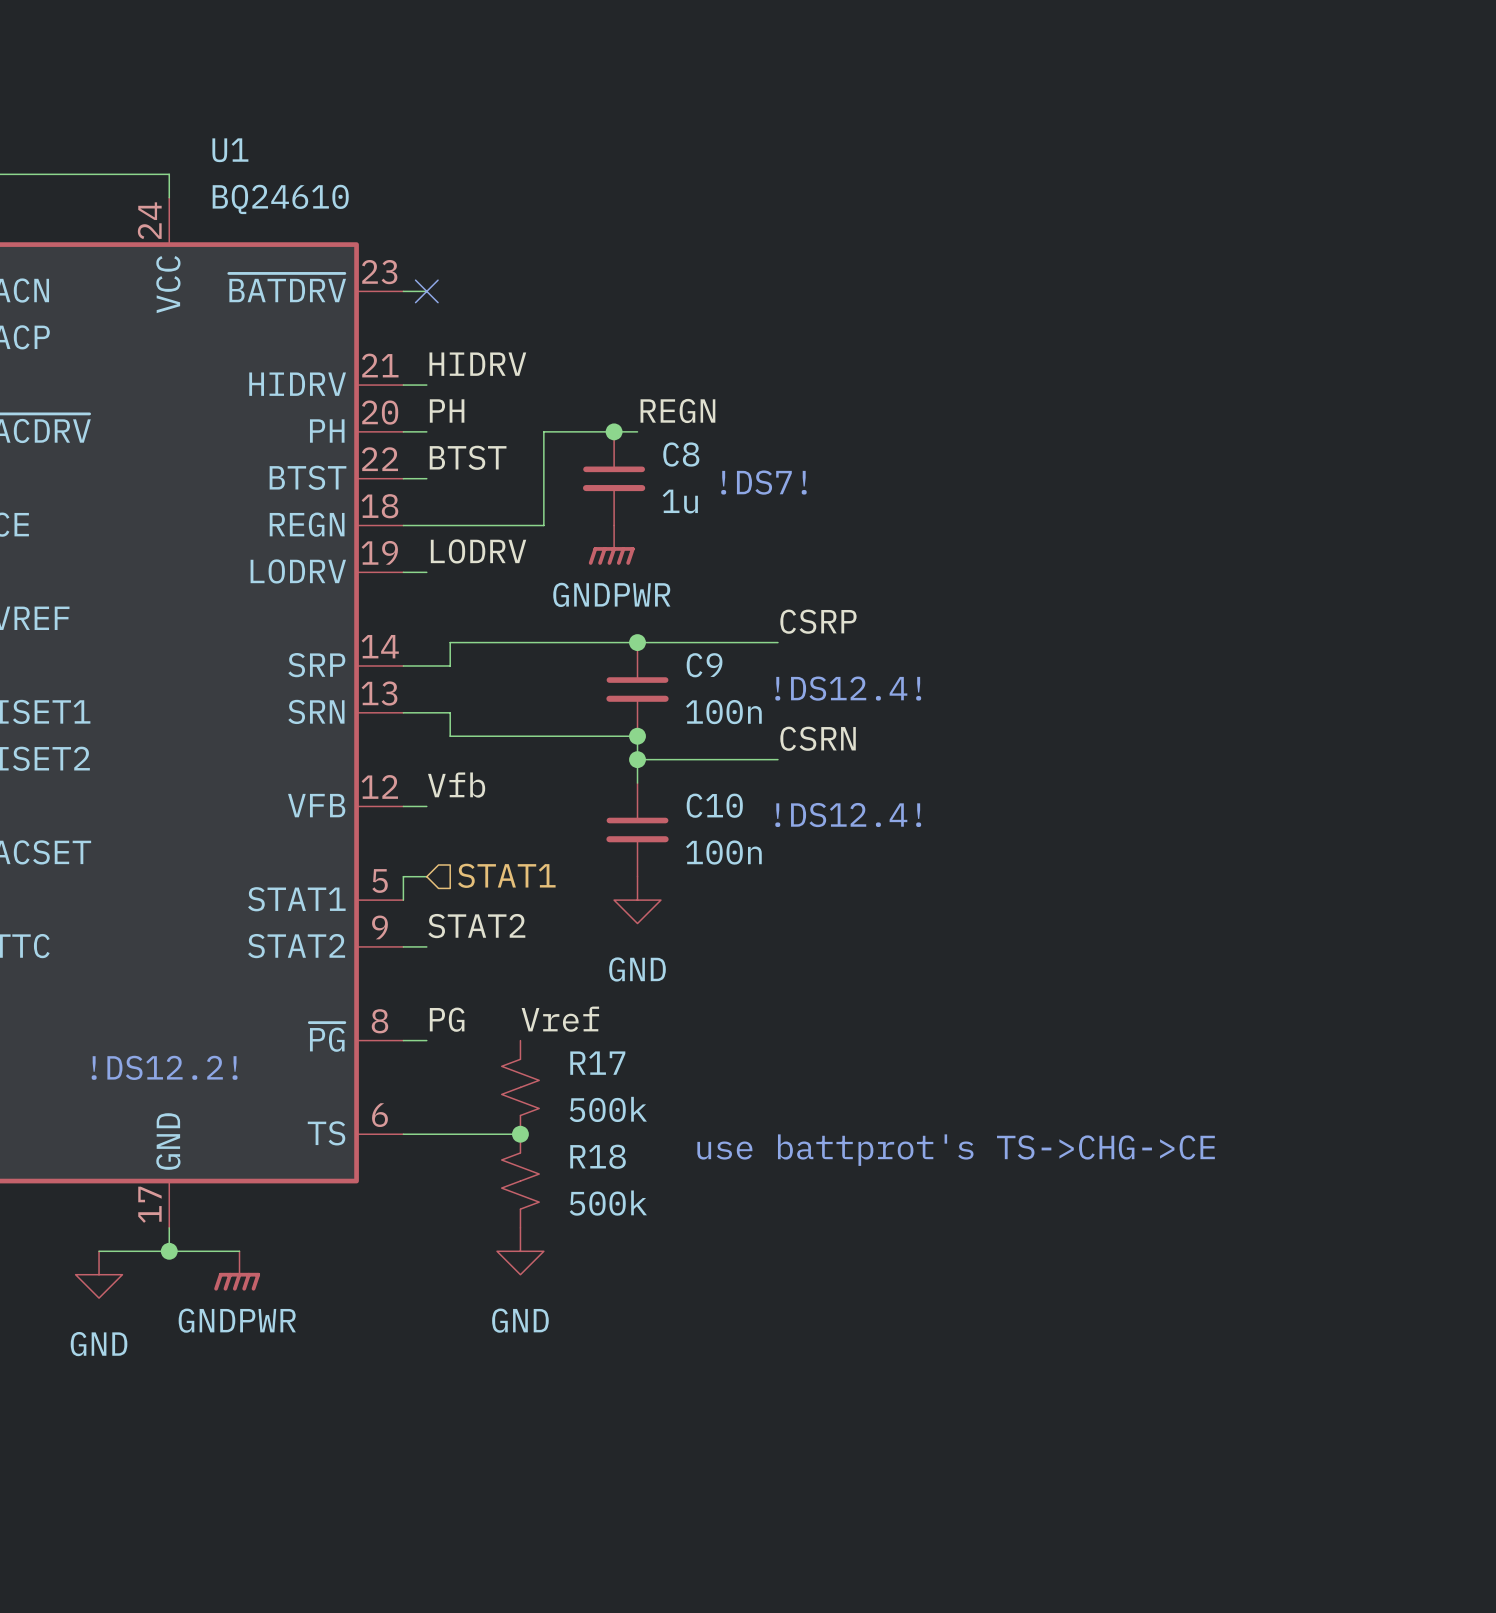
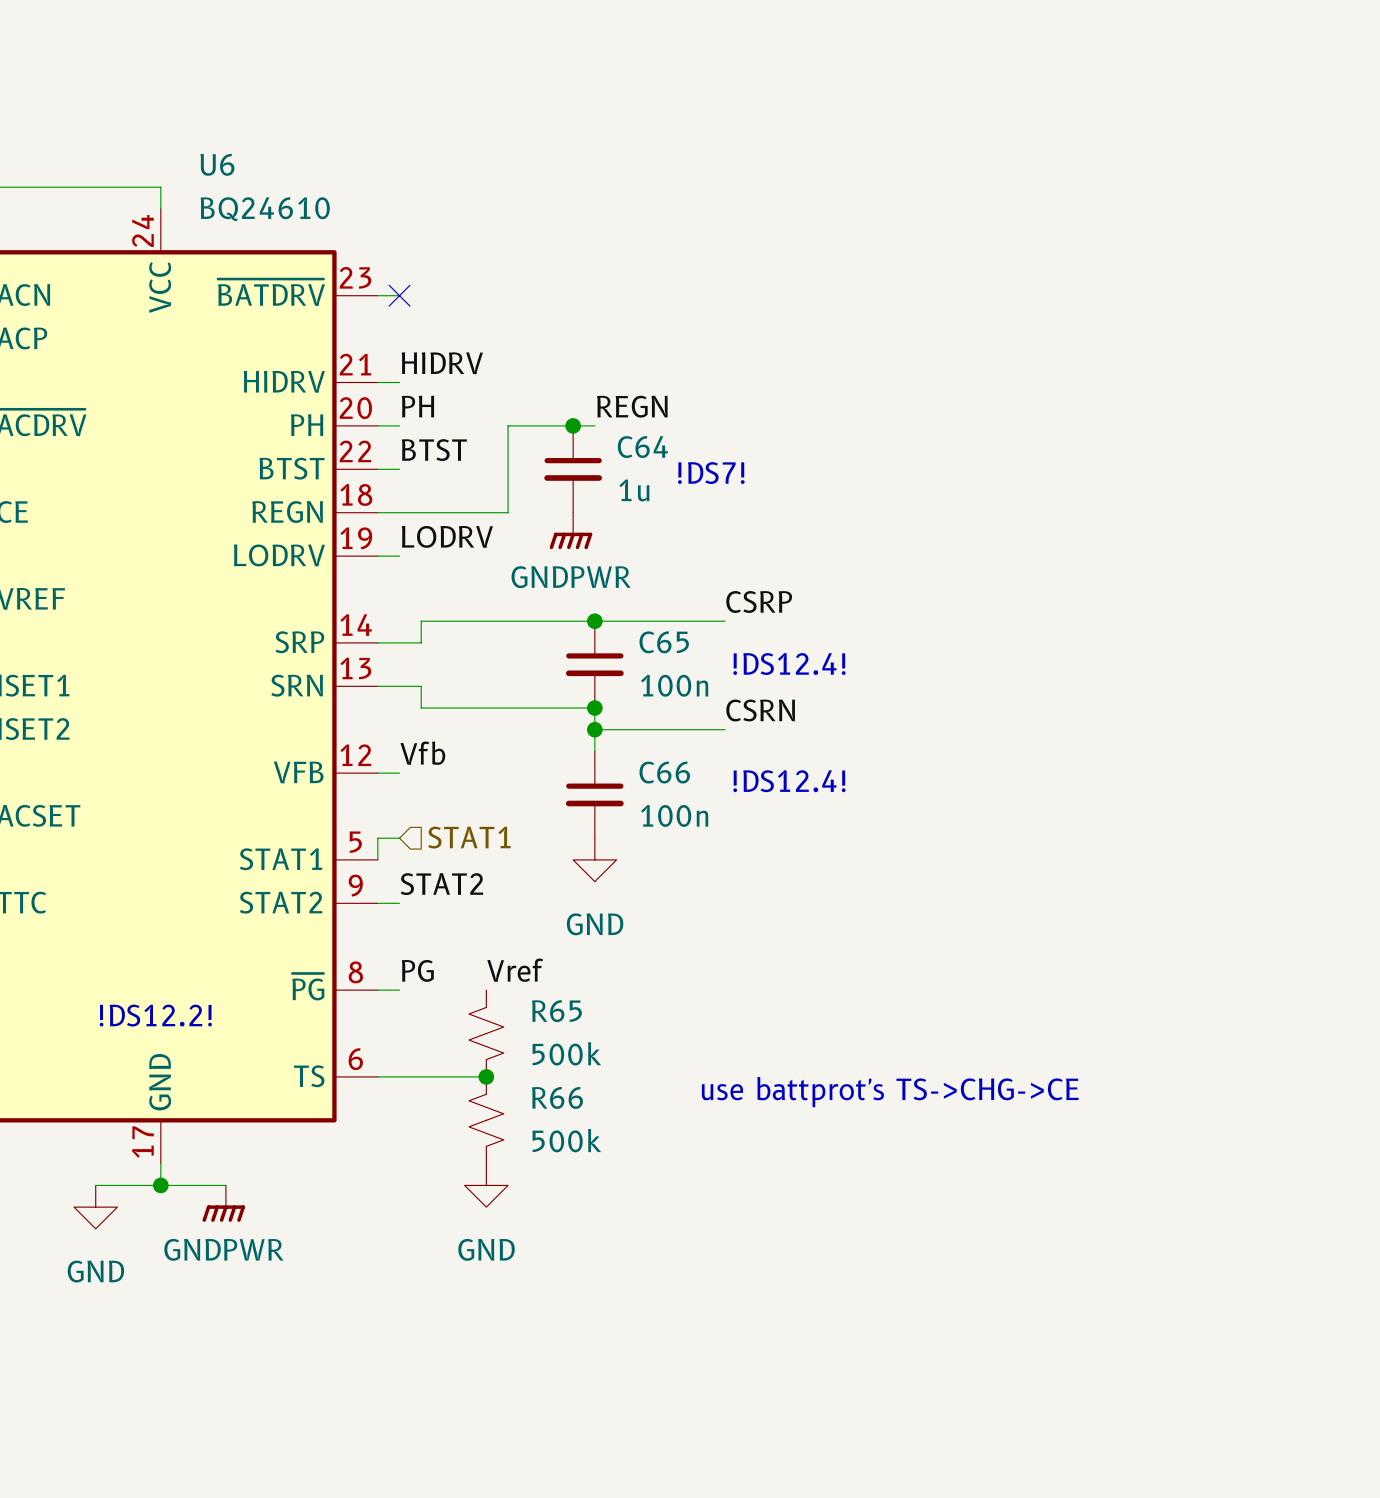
U1 name: U1 (230, 150) -> U6 (217, 164)
C8 name: C8 (681, 454) -> C64 (642, 447)
C9 name: C9 (704, 665) -> C65 (664, 642)
C10 name: C10 (714, 805) -> C66 (664, 772)
R17 name: R17 (597, 1063) -> R65 (556, 1011)
R18 name: R18 (598, 1156) -> R66 (557, 1097)

